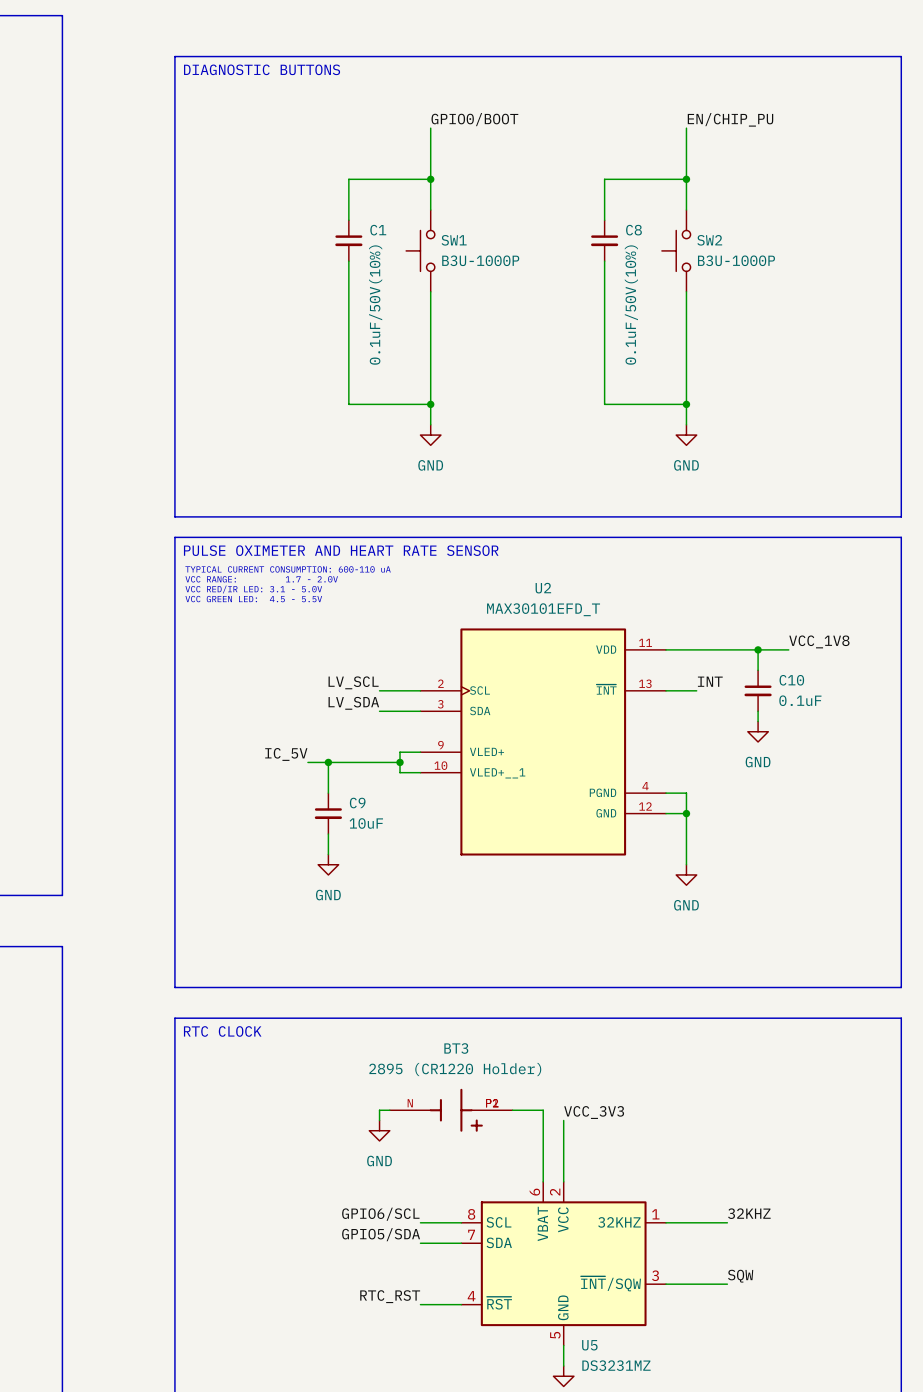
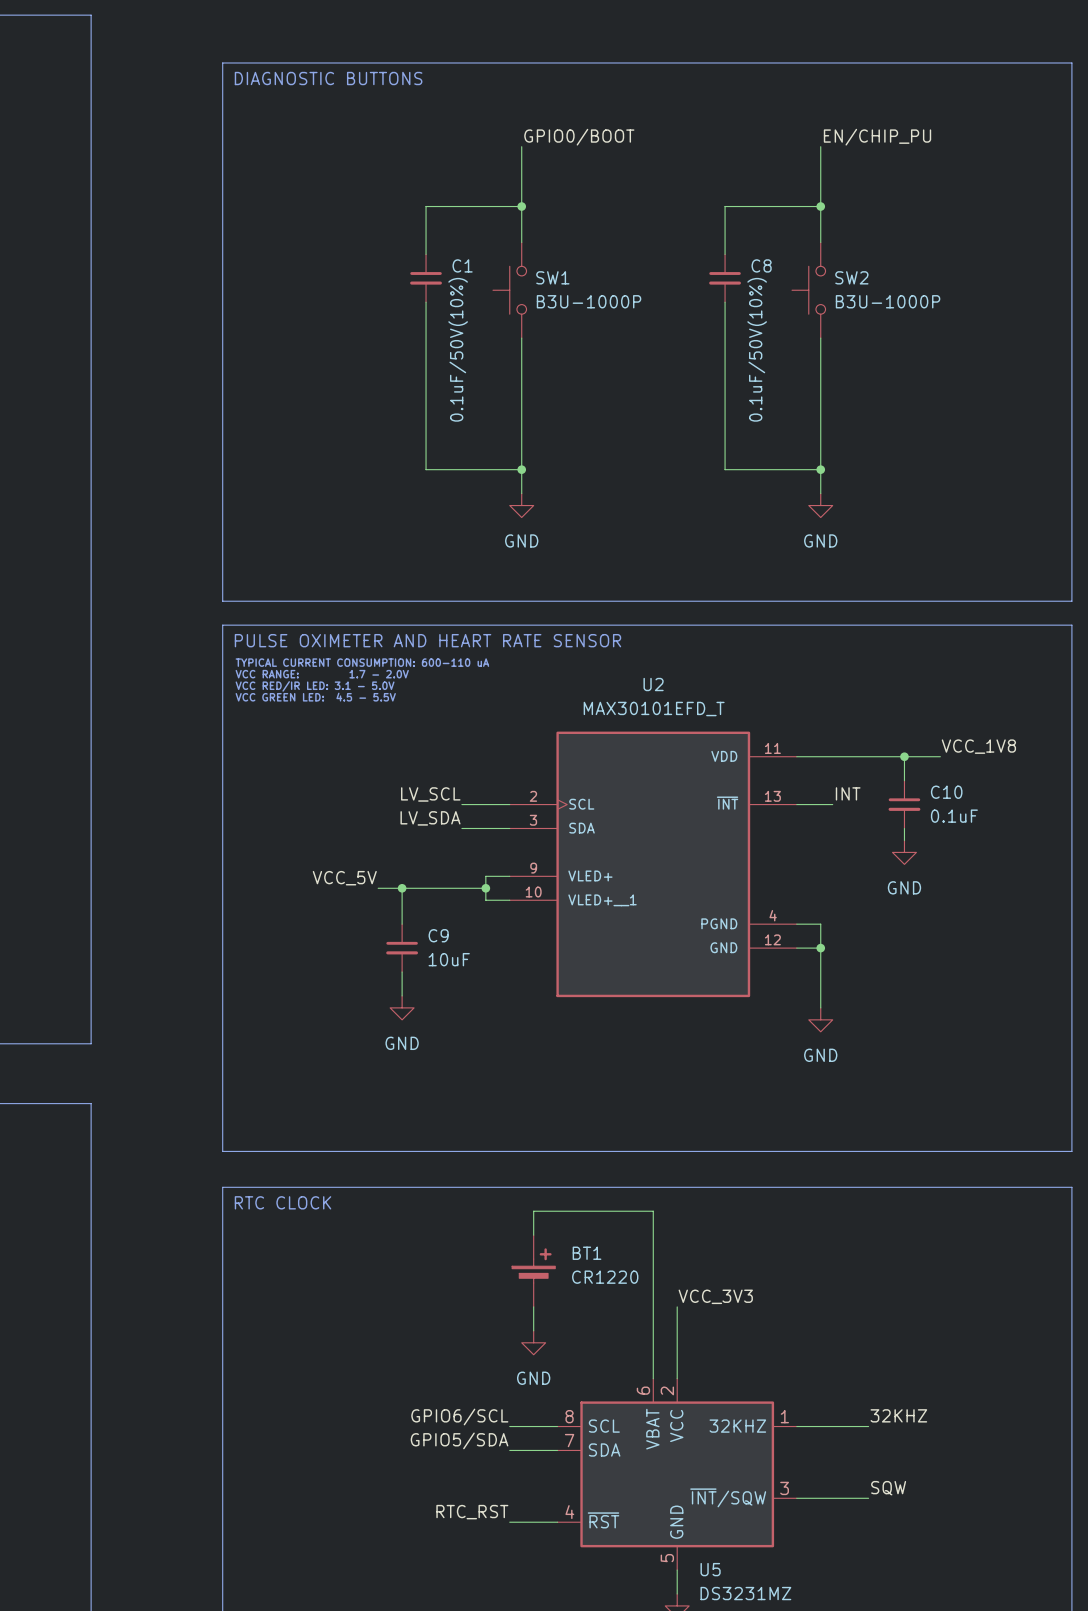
label: IC_5V (286, 754) -> VCC_5V (344, 878)
BT1: none -> CR1220 (533, 1271)
wire: (389, 1110) (379, 1110) (379, 1120) -> none
BT3: 2895 (CR1220 Holder) (451, 1110) -> none
wire: (512, 1110) (543, 1110) -> (533, 1235) (533, 1211) (653, 1211) (653, 1294)
wire: none -> (533, 1306) (533, 1330)
power symbol position: GND (379, 1130) -> GND (533, 1342)

